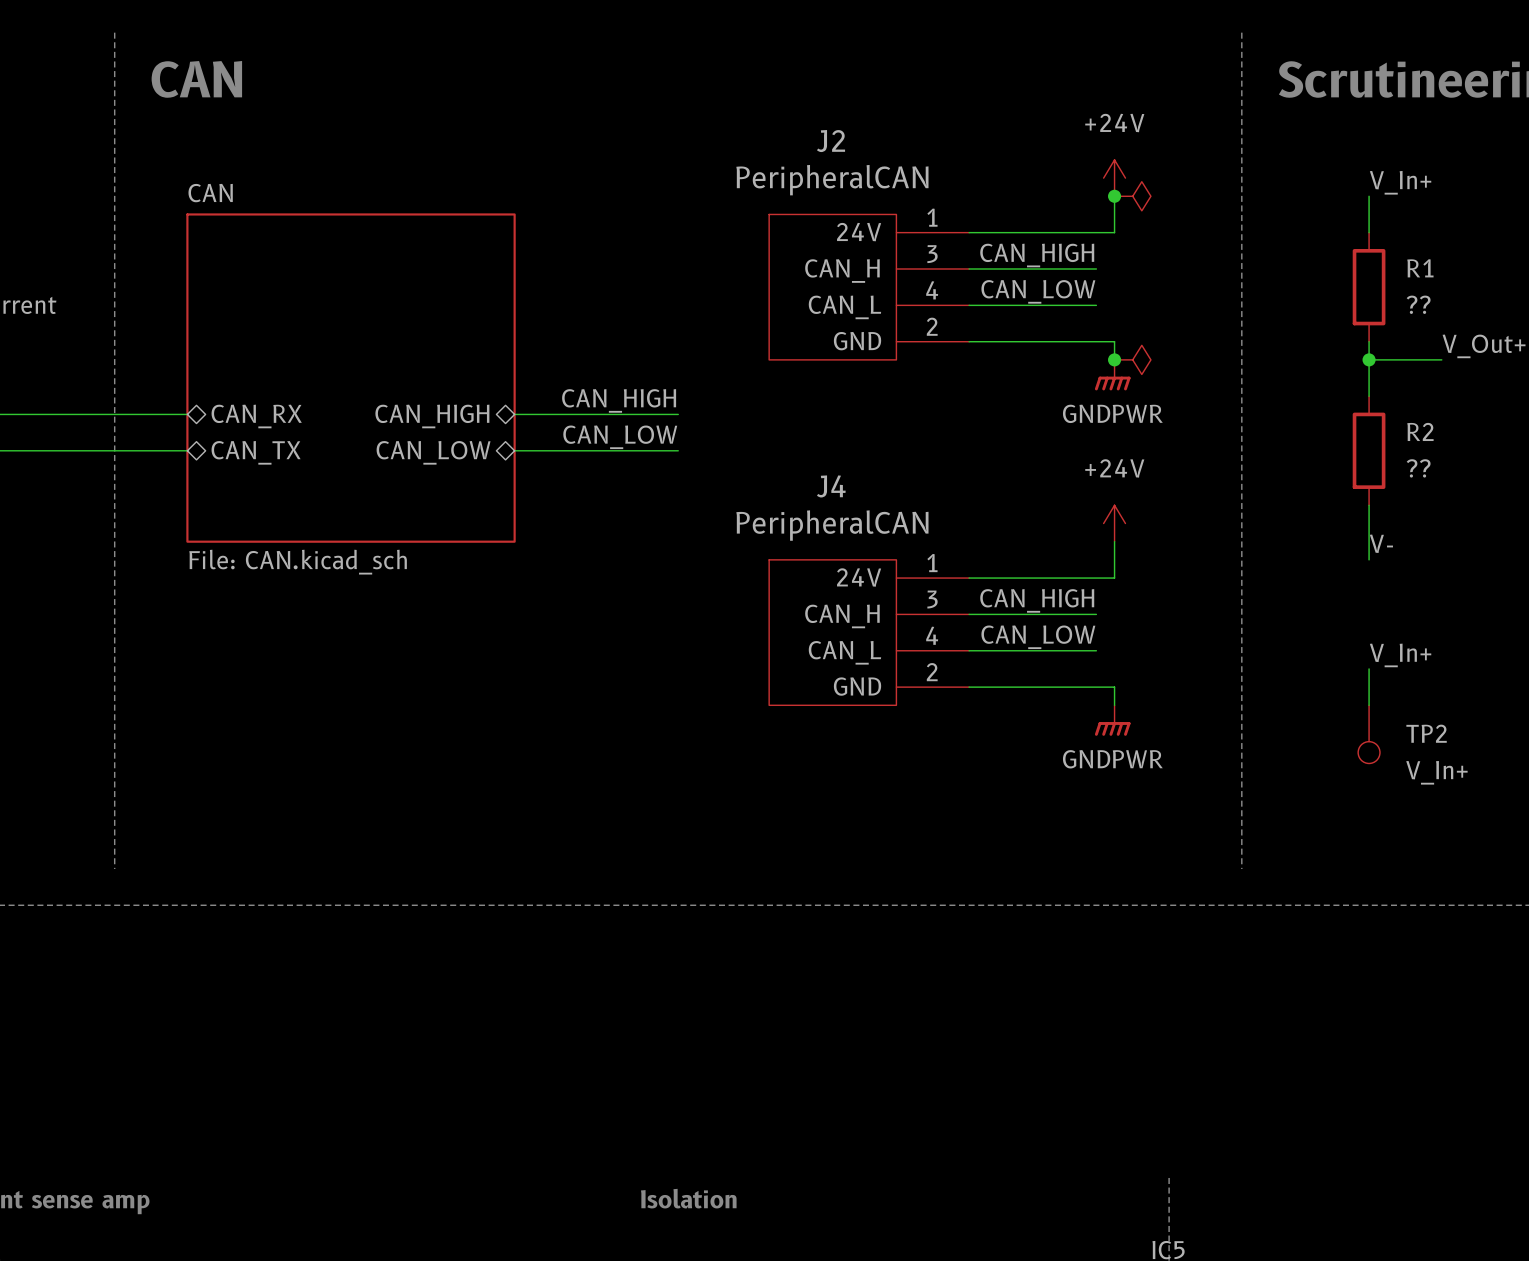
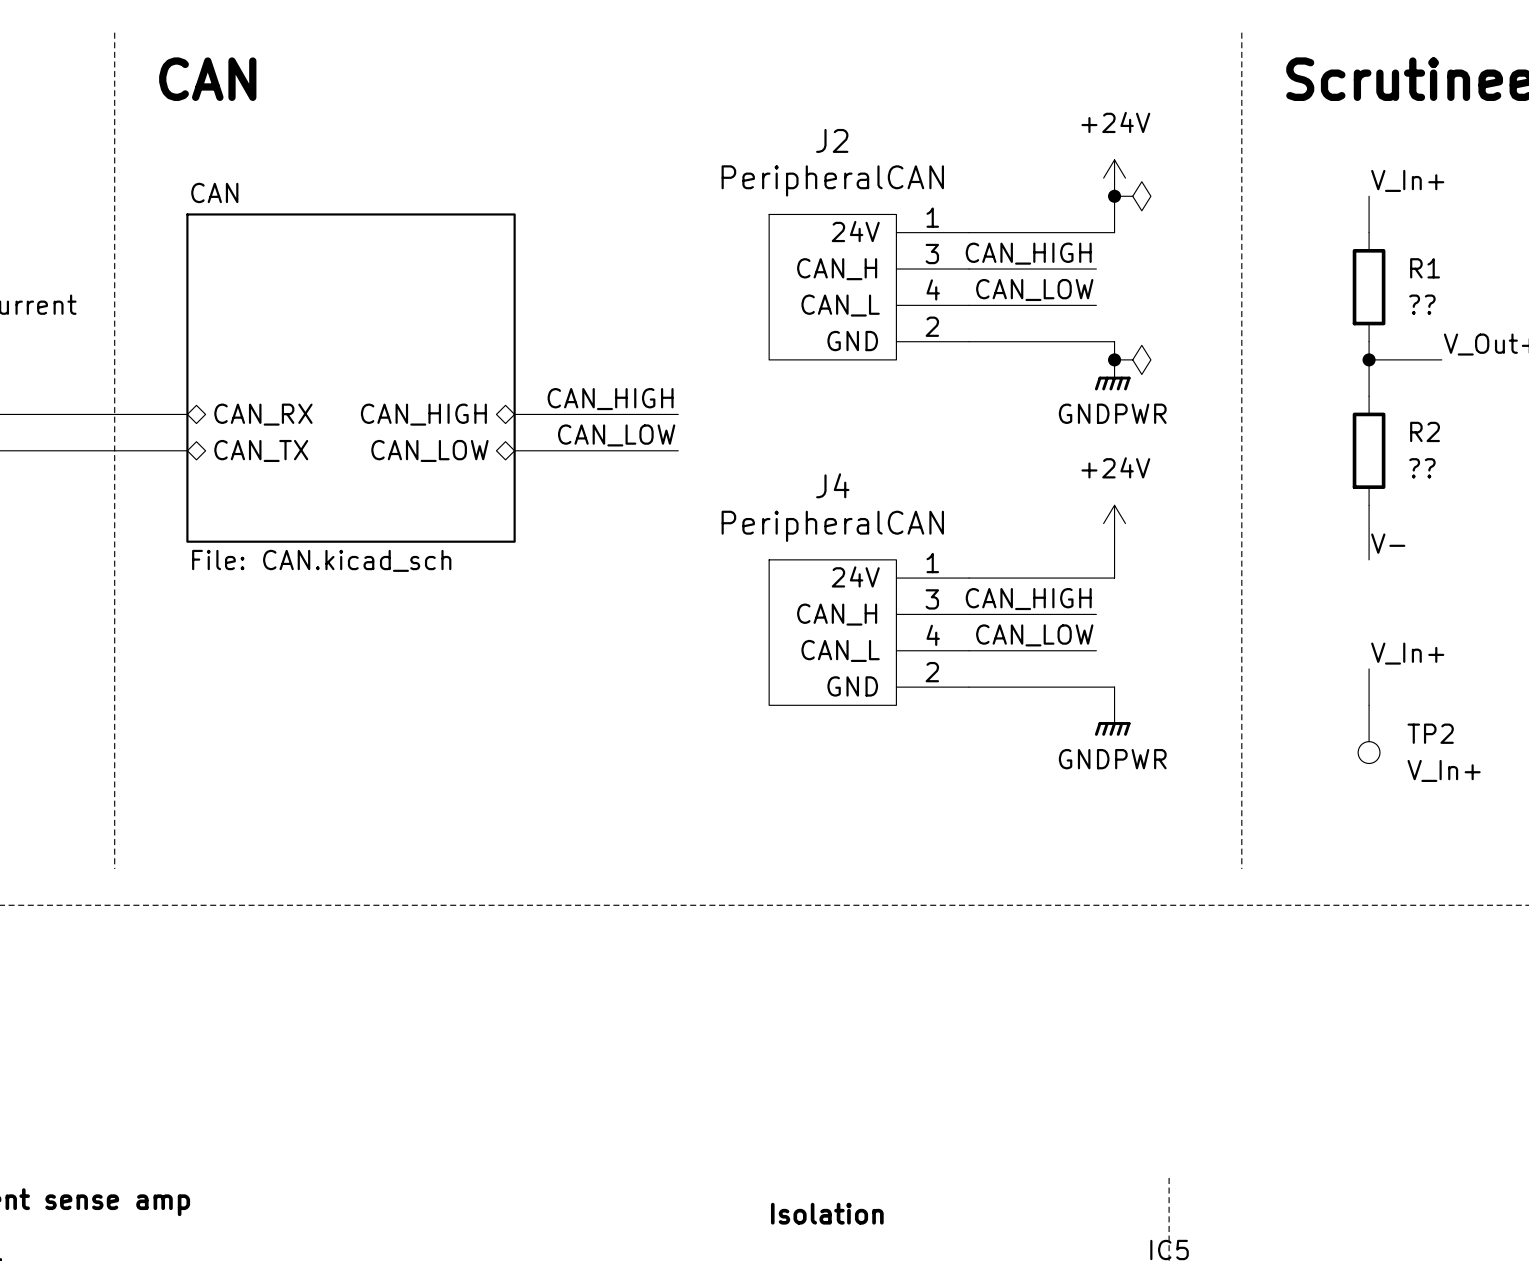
text position: Isolation (688, 1198) -> Isolation (827, 1213)

